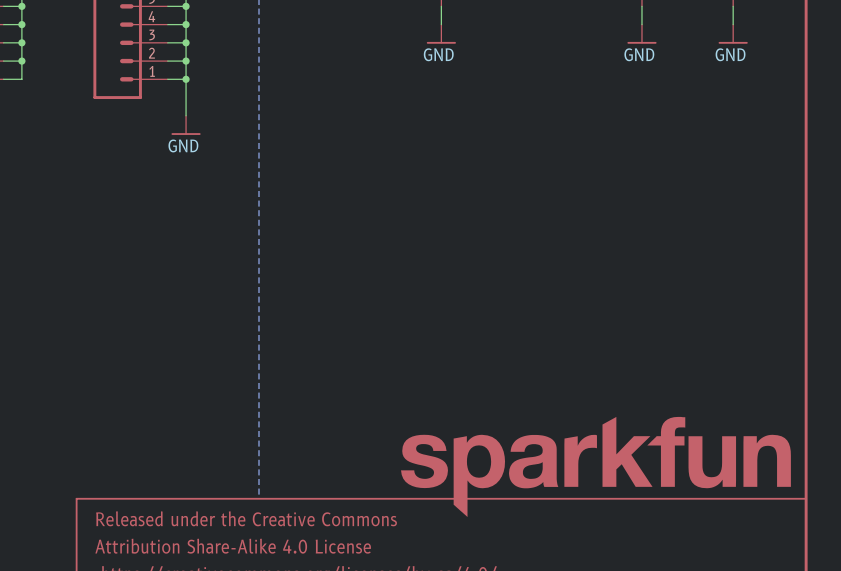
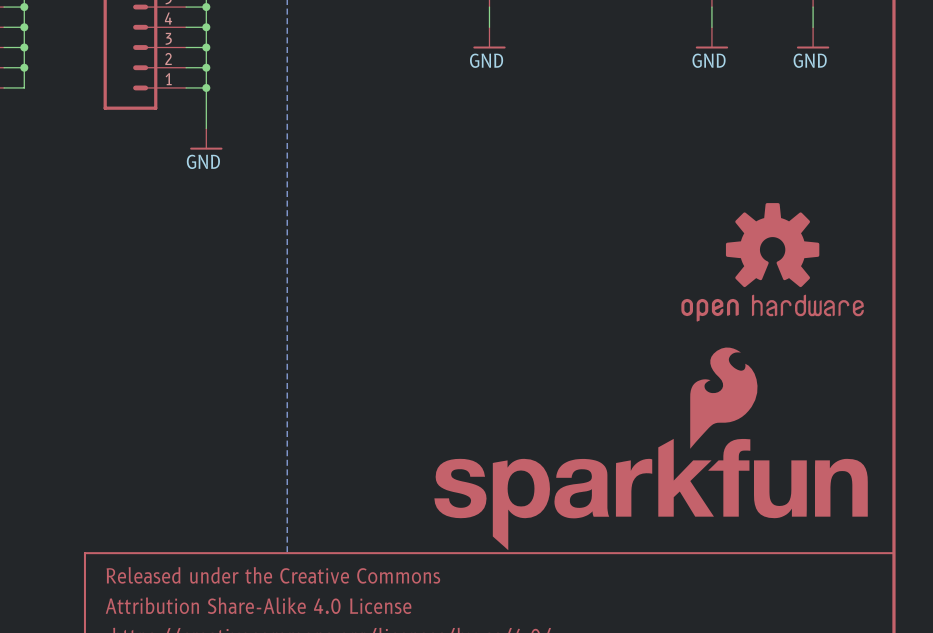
part: none -> (772, 262)
part: none -> (651, 448)
part: (595, 466) -> none

